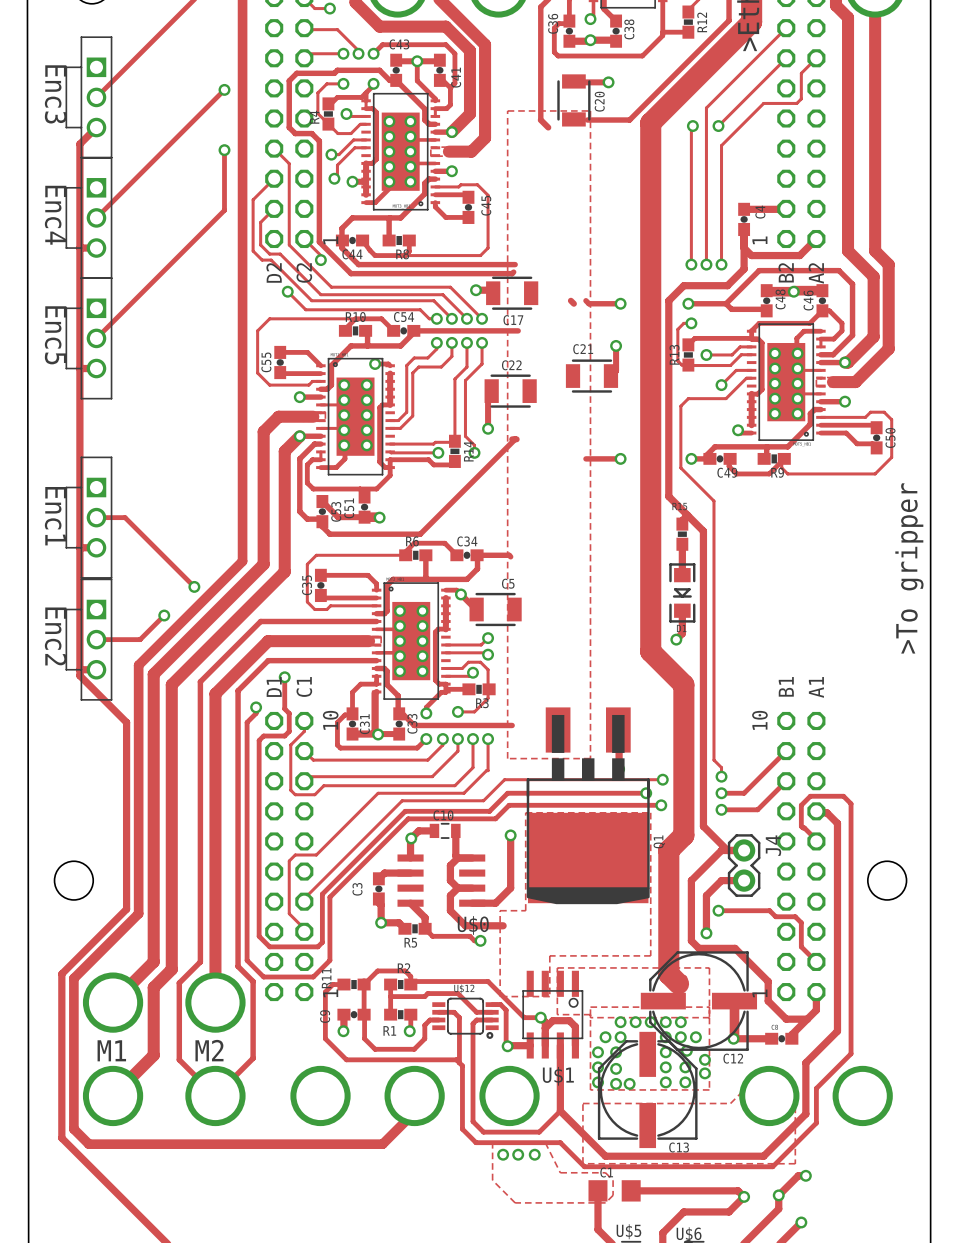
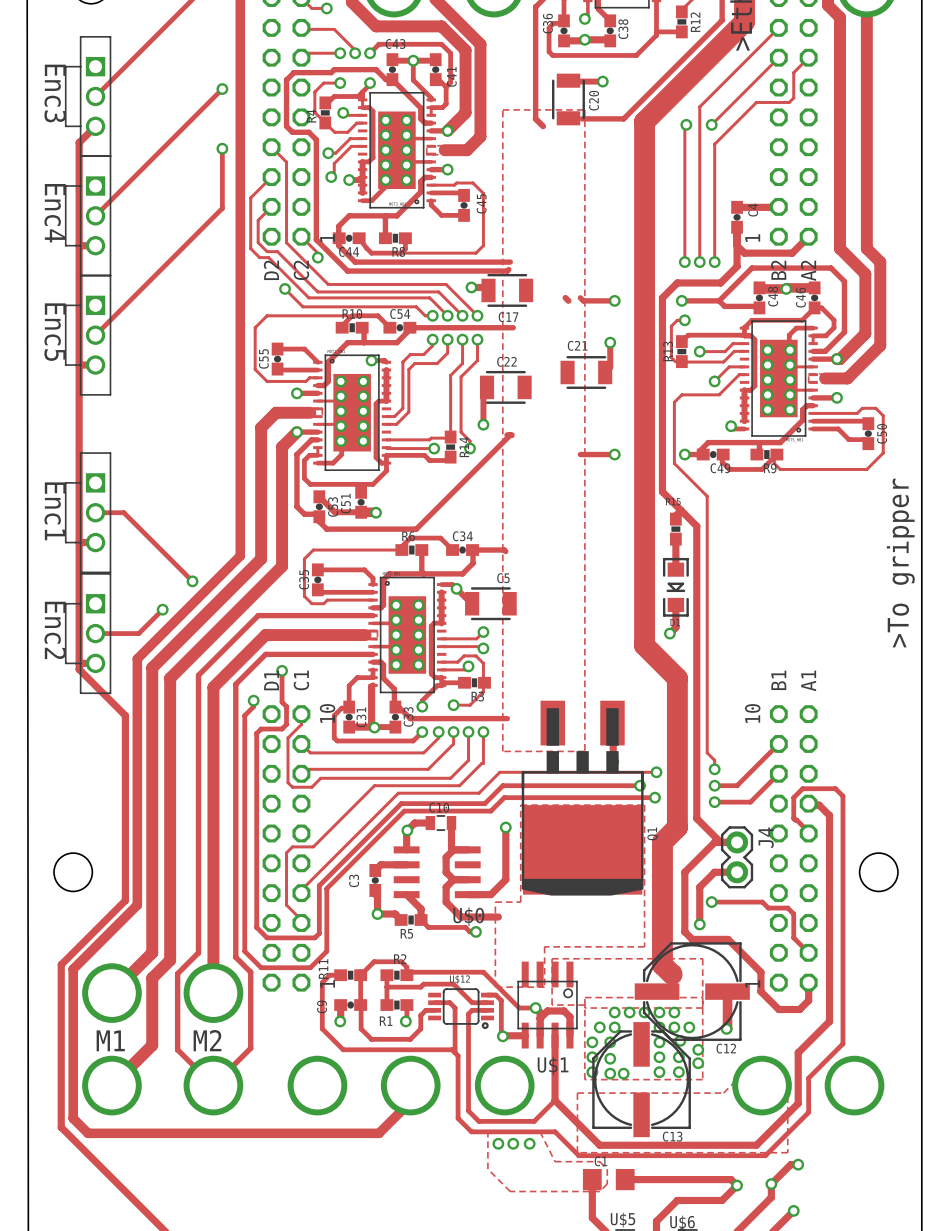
track: (807, 1019) (791, 1034) (791, 1038) -> none
track: (733, 1038) (771, 1038) -> none
part: (781, 1038) -> none

